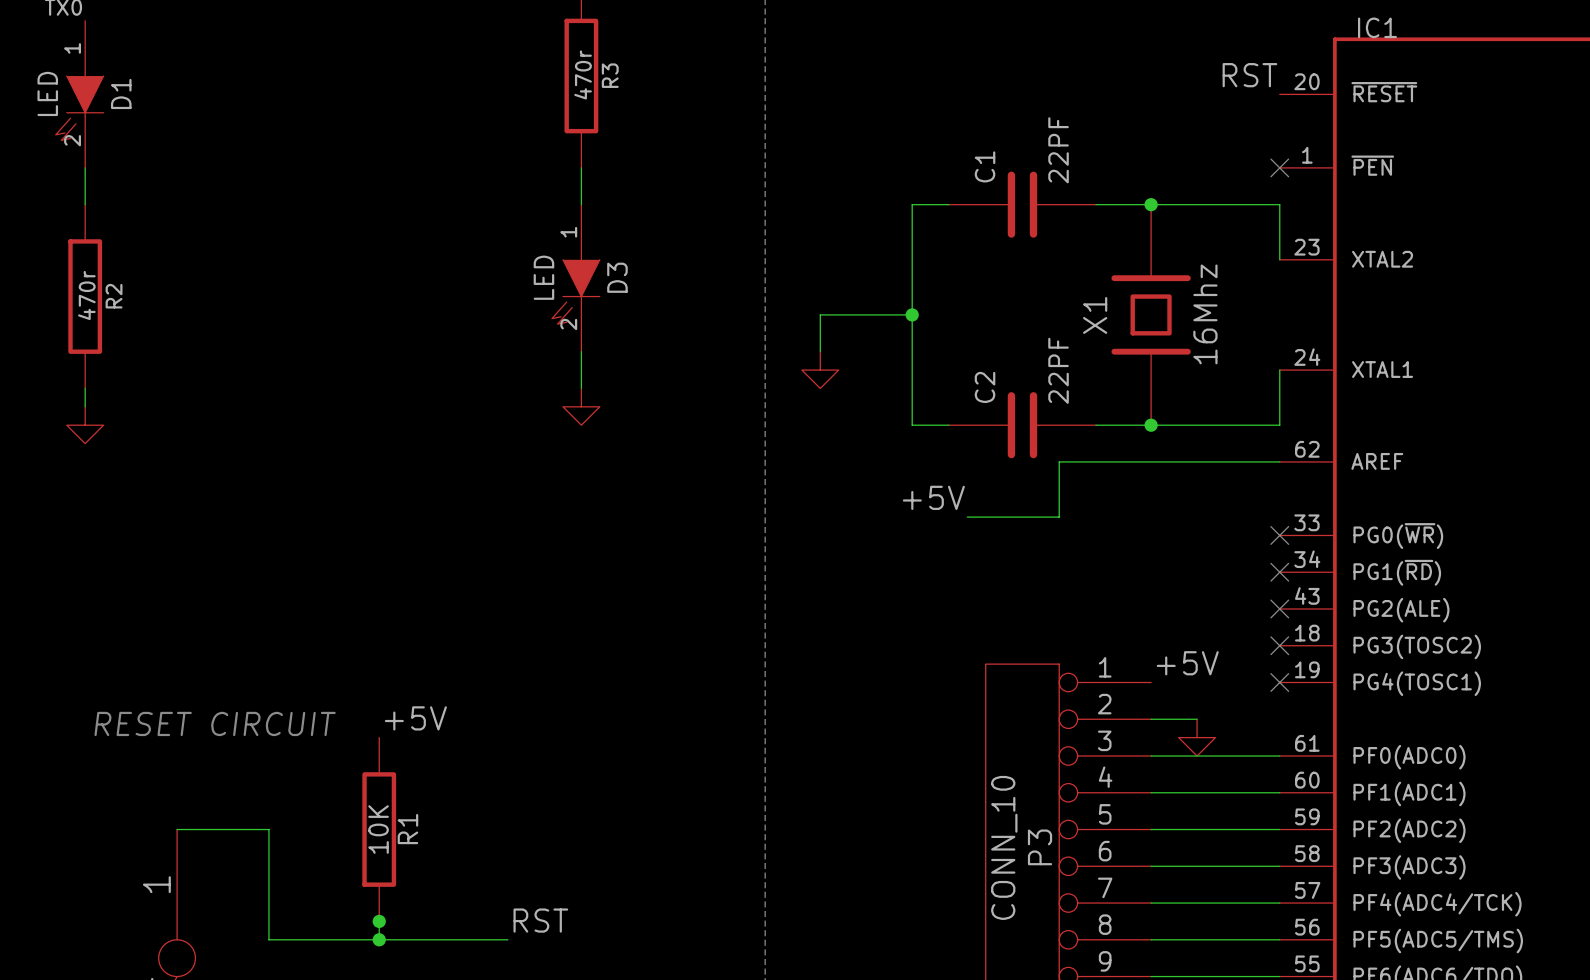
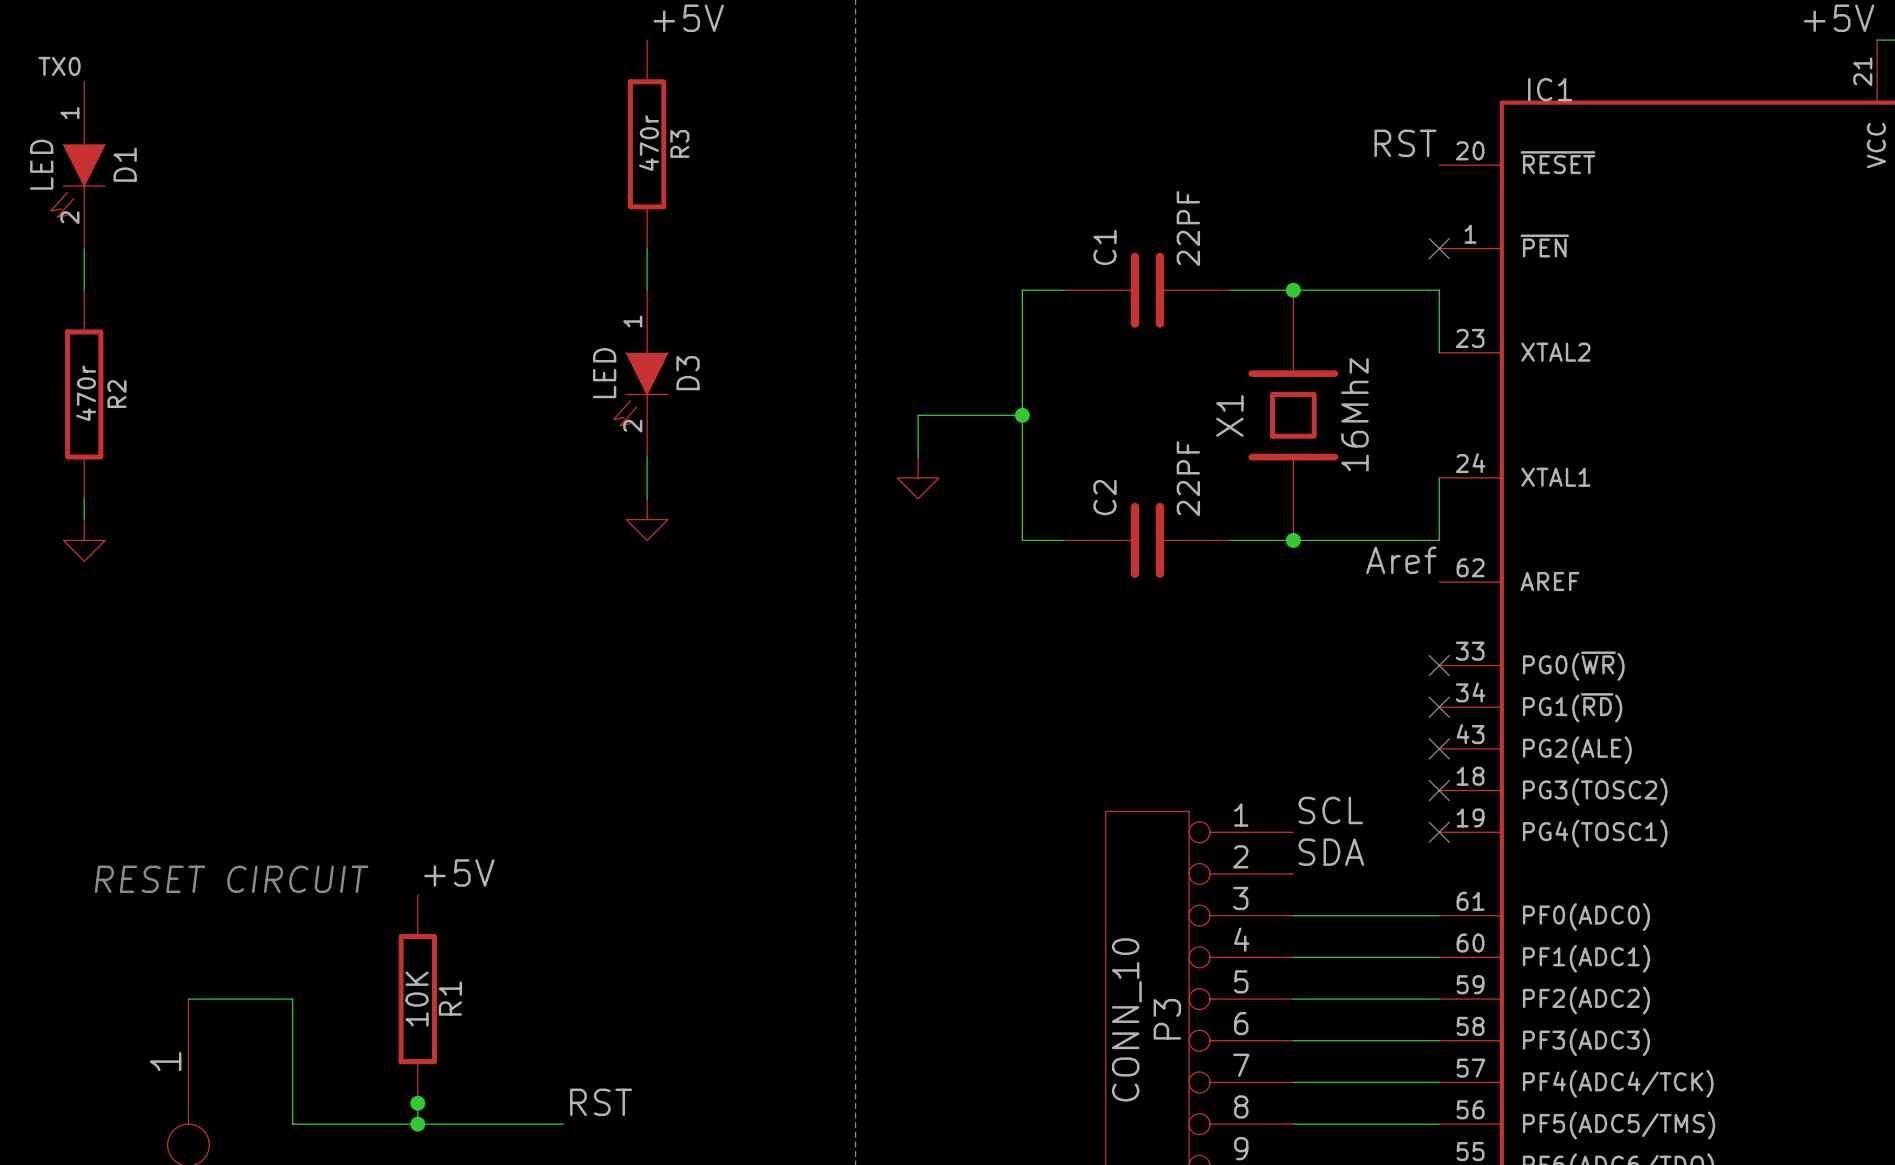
label: none -> Aref (1401, 560)
wire: (1279, 461) (1059, 461) (1059, 517) (967, 517) -> none
label: +5V (933, 497) -> none
label: +5V (1187, 663) -> SCL (1330, 810)
label: none -> SDA (1331, 852)
wire: (1151, 719) (1197, 719) -> none
power symbol: (1197, 737) -> none

